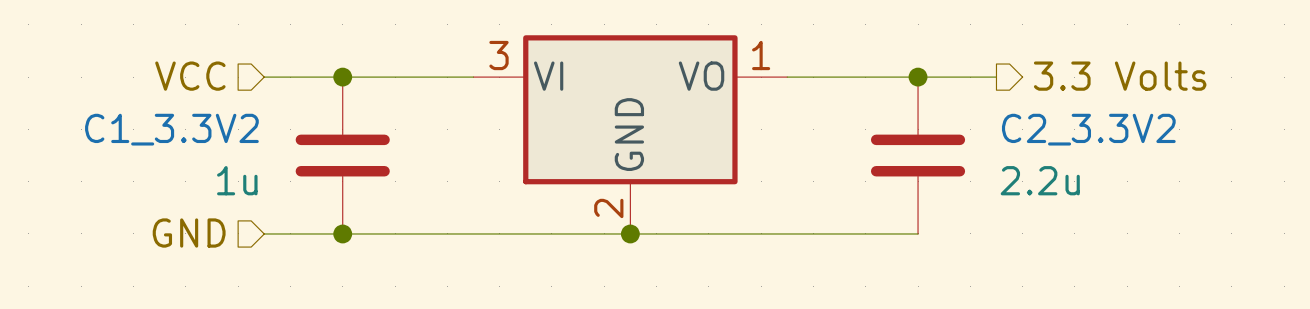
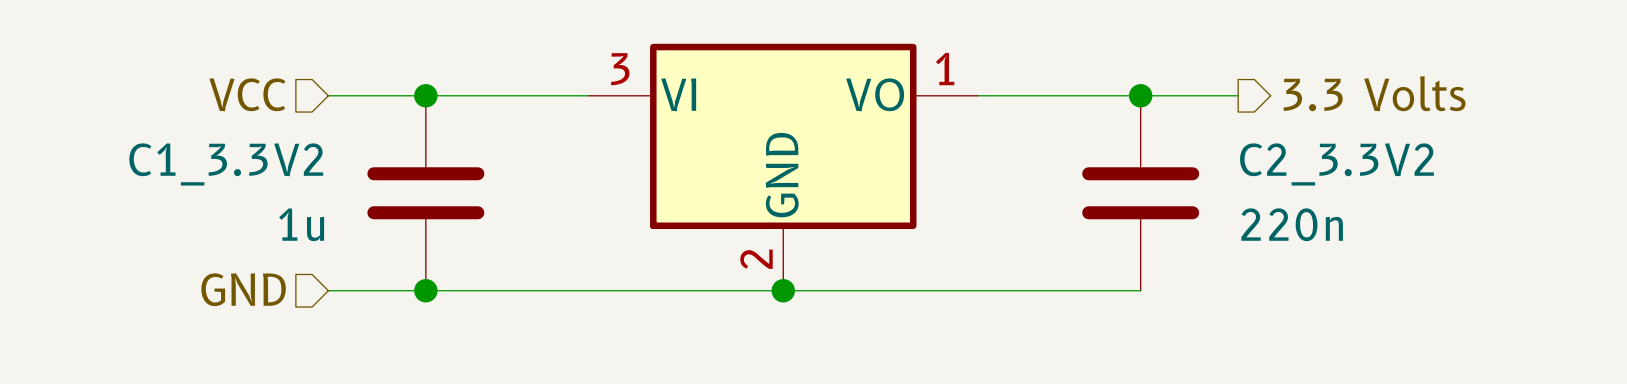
C2_3.3V2 value: 2.2u (1040, 180) -> 220n (1292, 224)

